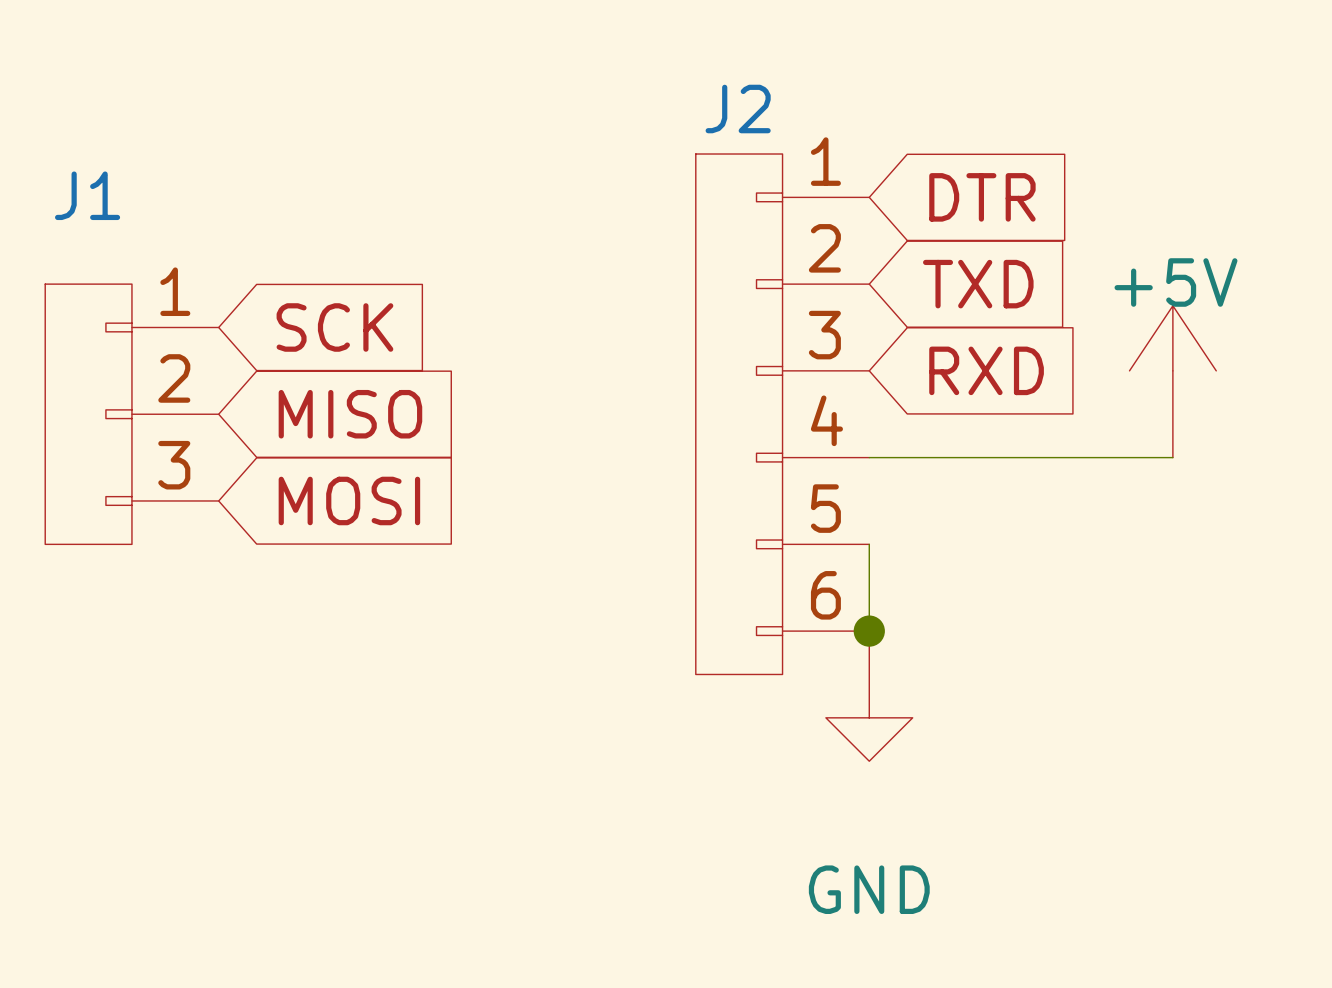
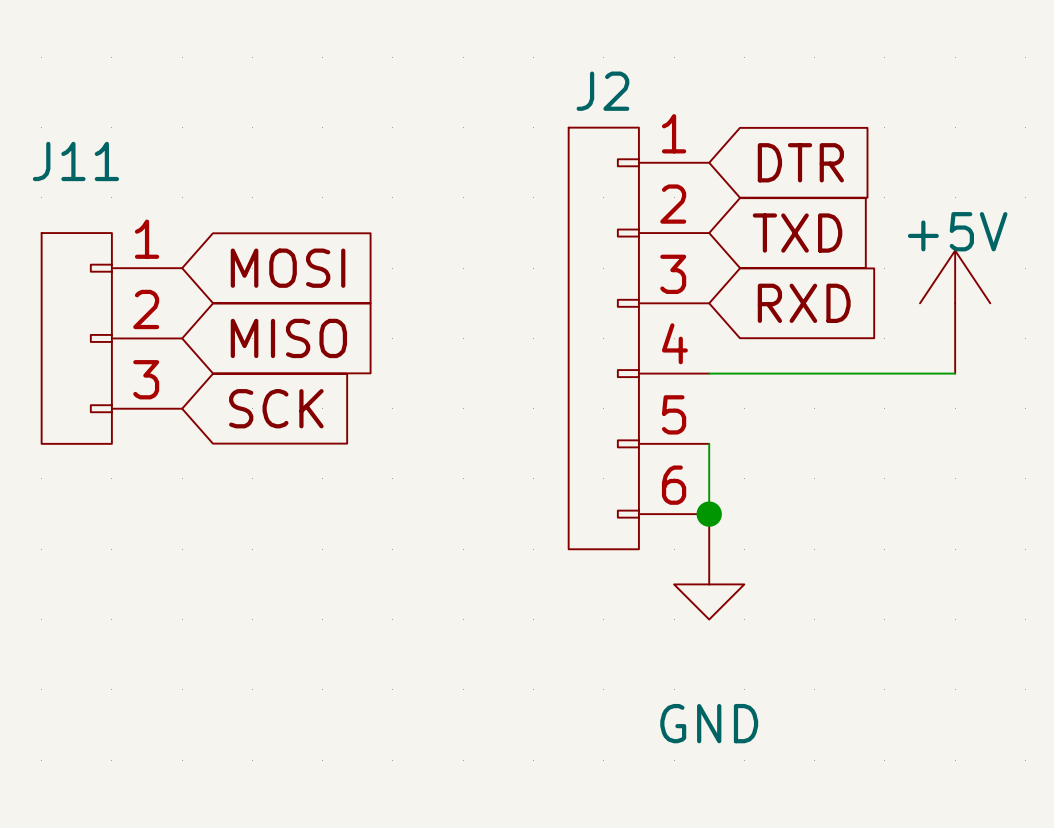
J1 name: J1 (87, 195) -> J11 (75, 161)
global label: SCK (334, 327) -> MOSI (288, 268)
global label: MOSI (349, 500) -> SCK (276, 408)

